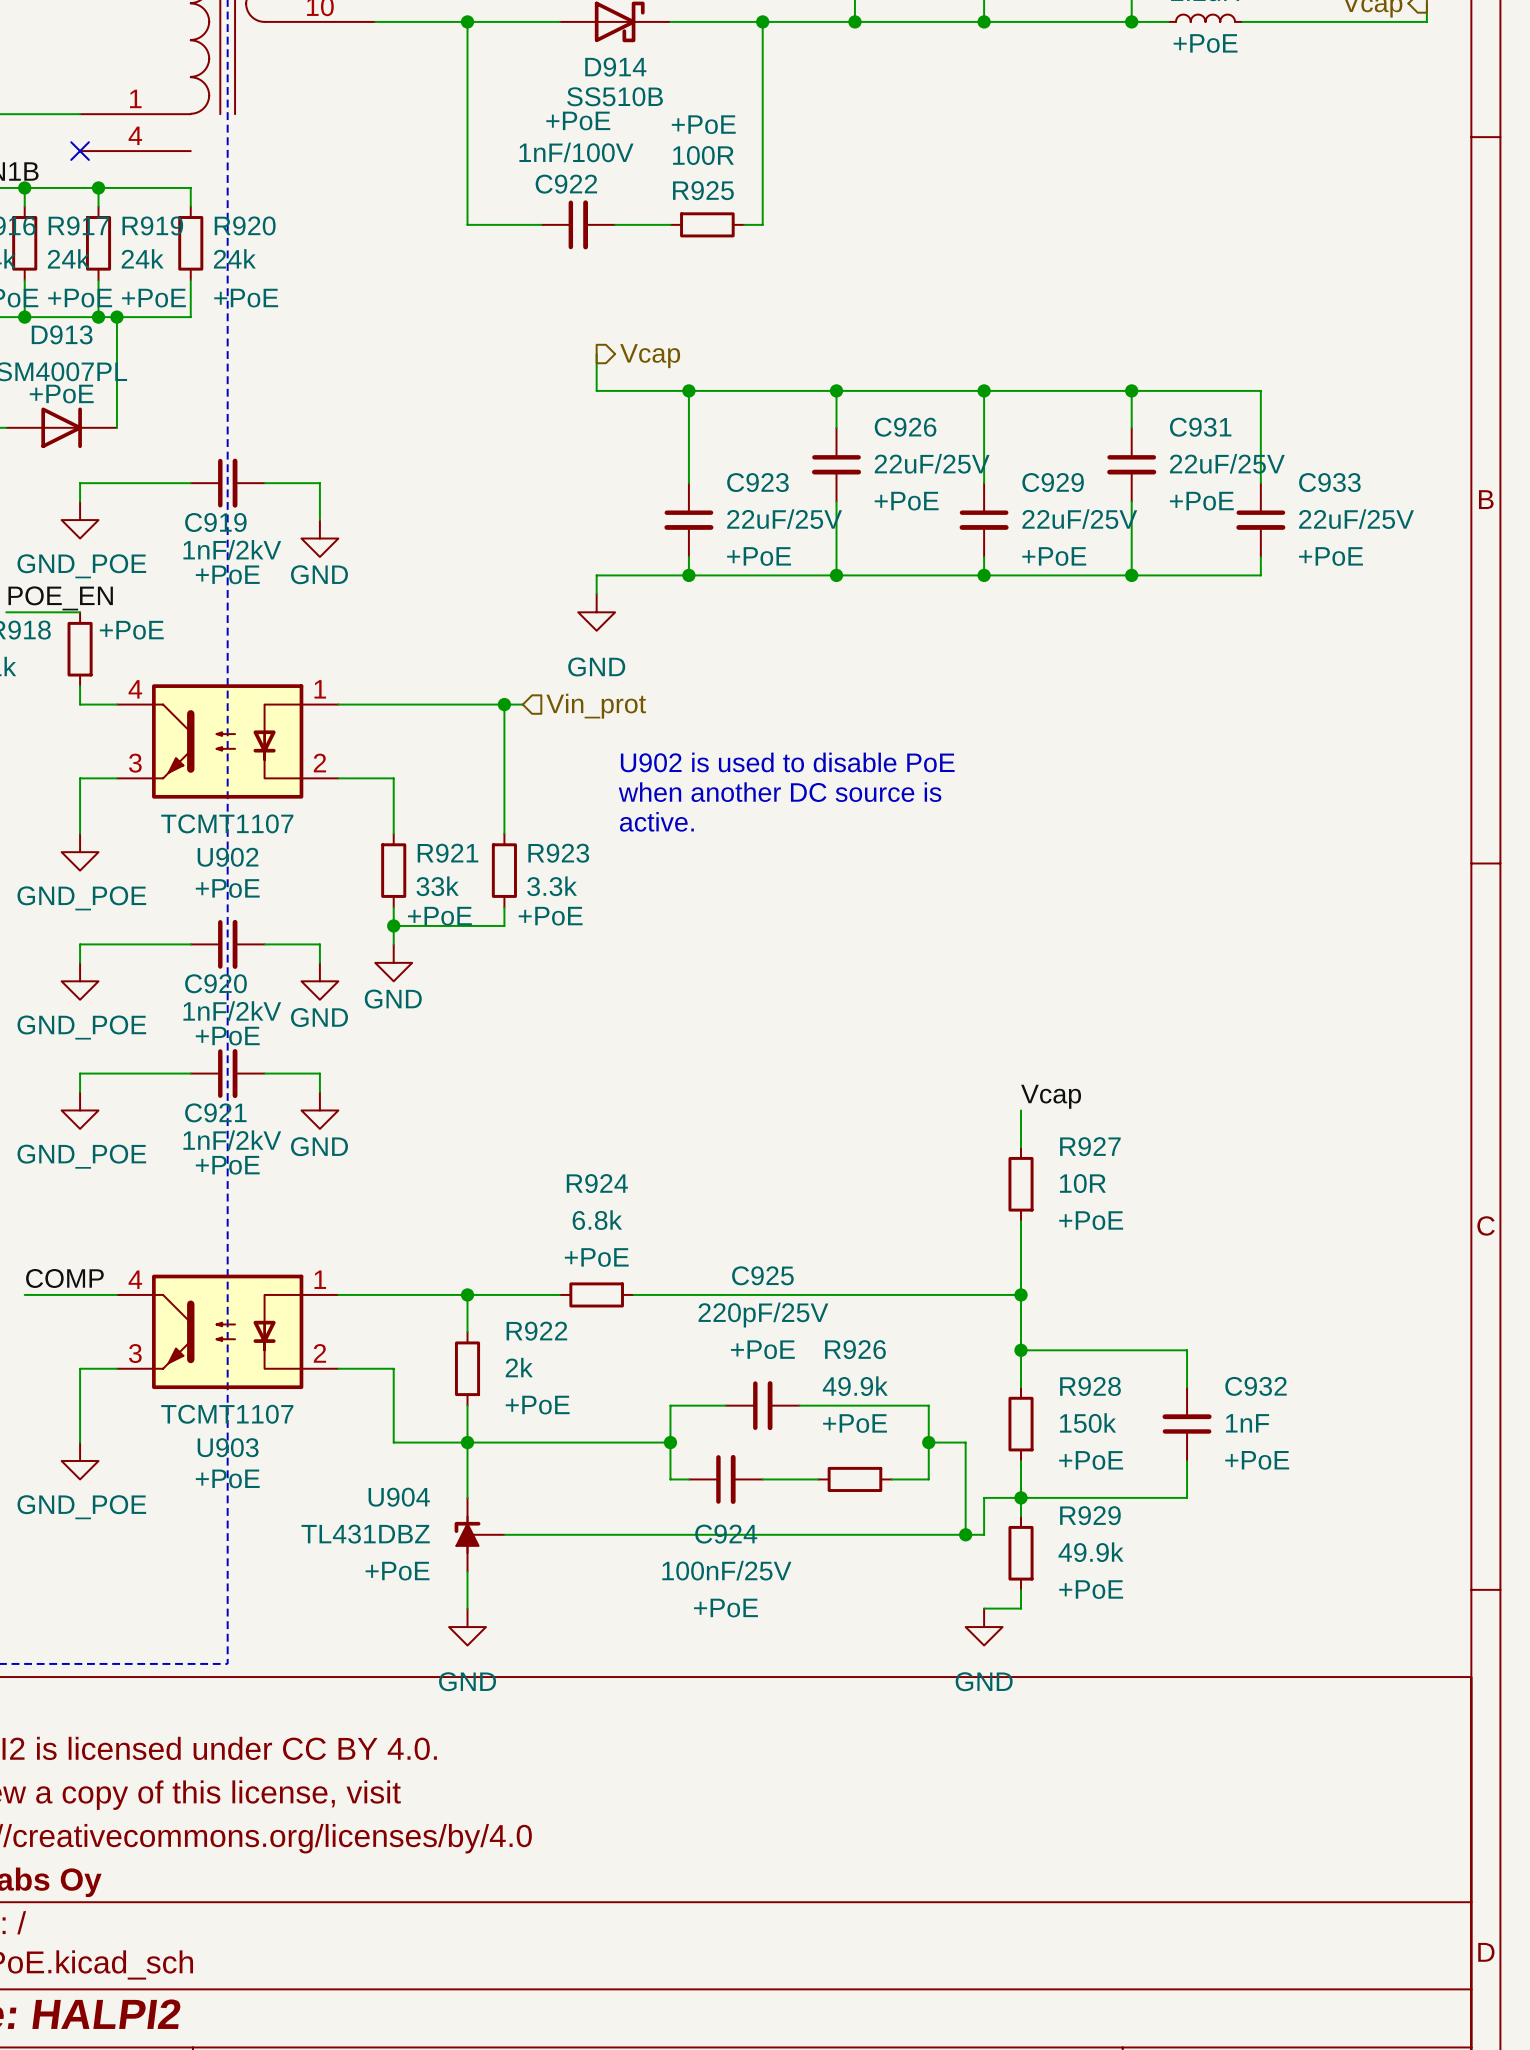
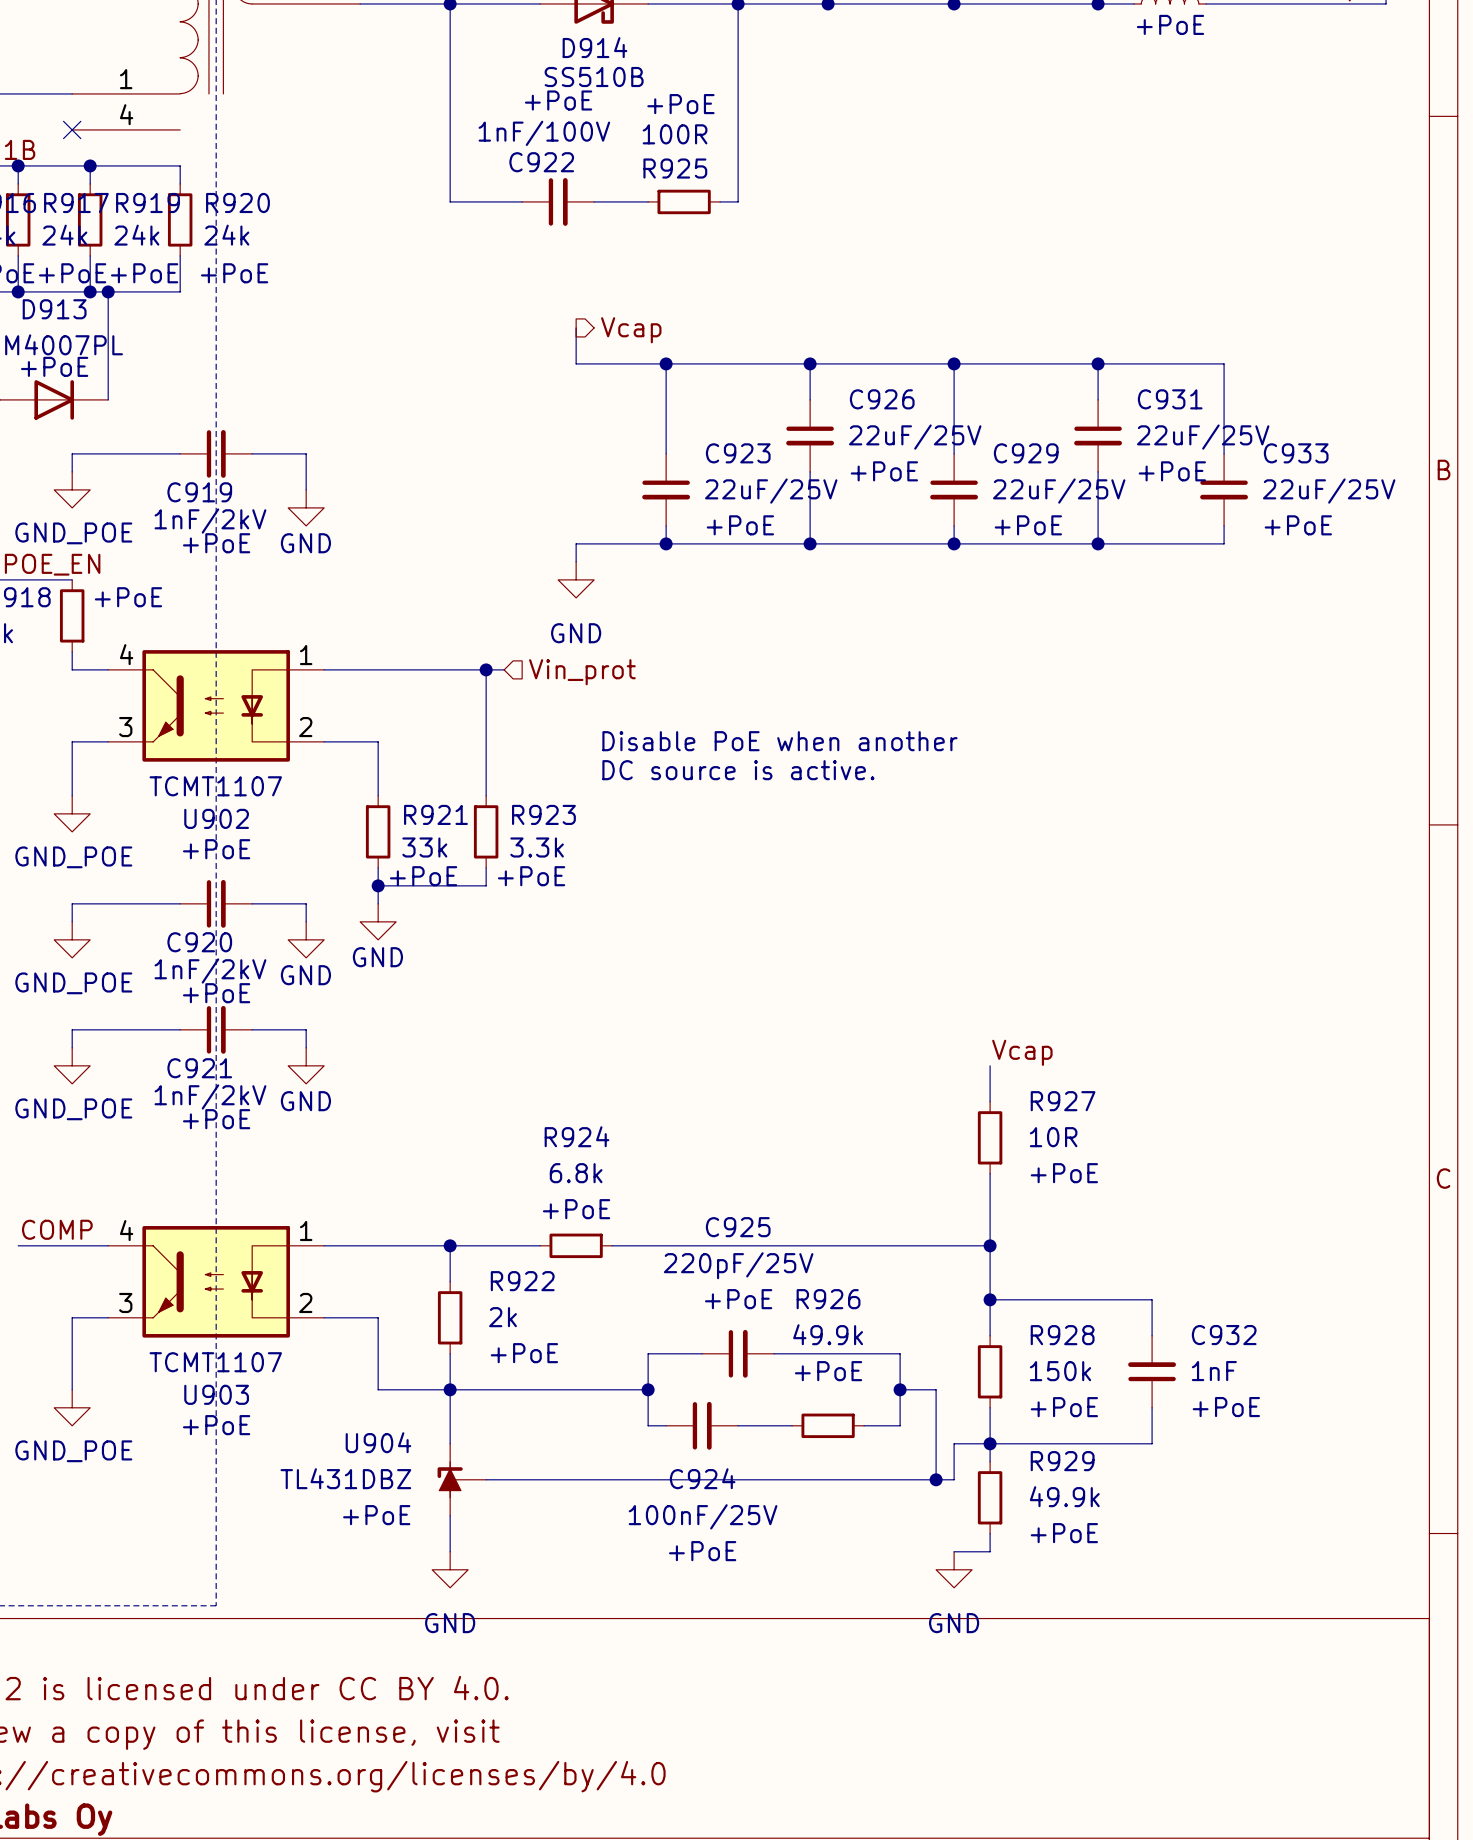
text: U902 is used to disable PoE (787, 762) -> none
text: none -> Disable PoE when another (779, 741)
text: when another DC source is (780, 792) -> none
text: none -> DC source is active. (738, 770)
text: active. (656, 821) -> none

